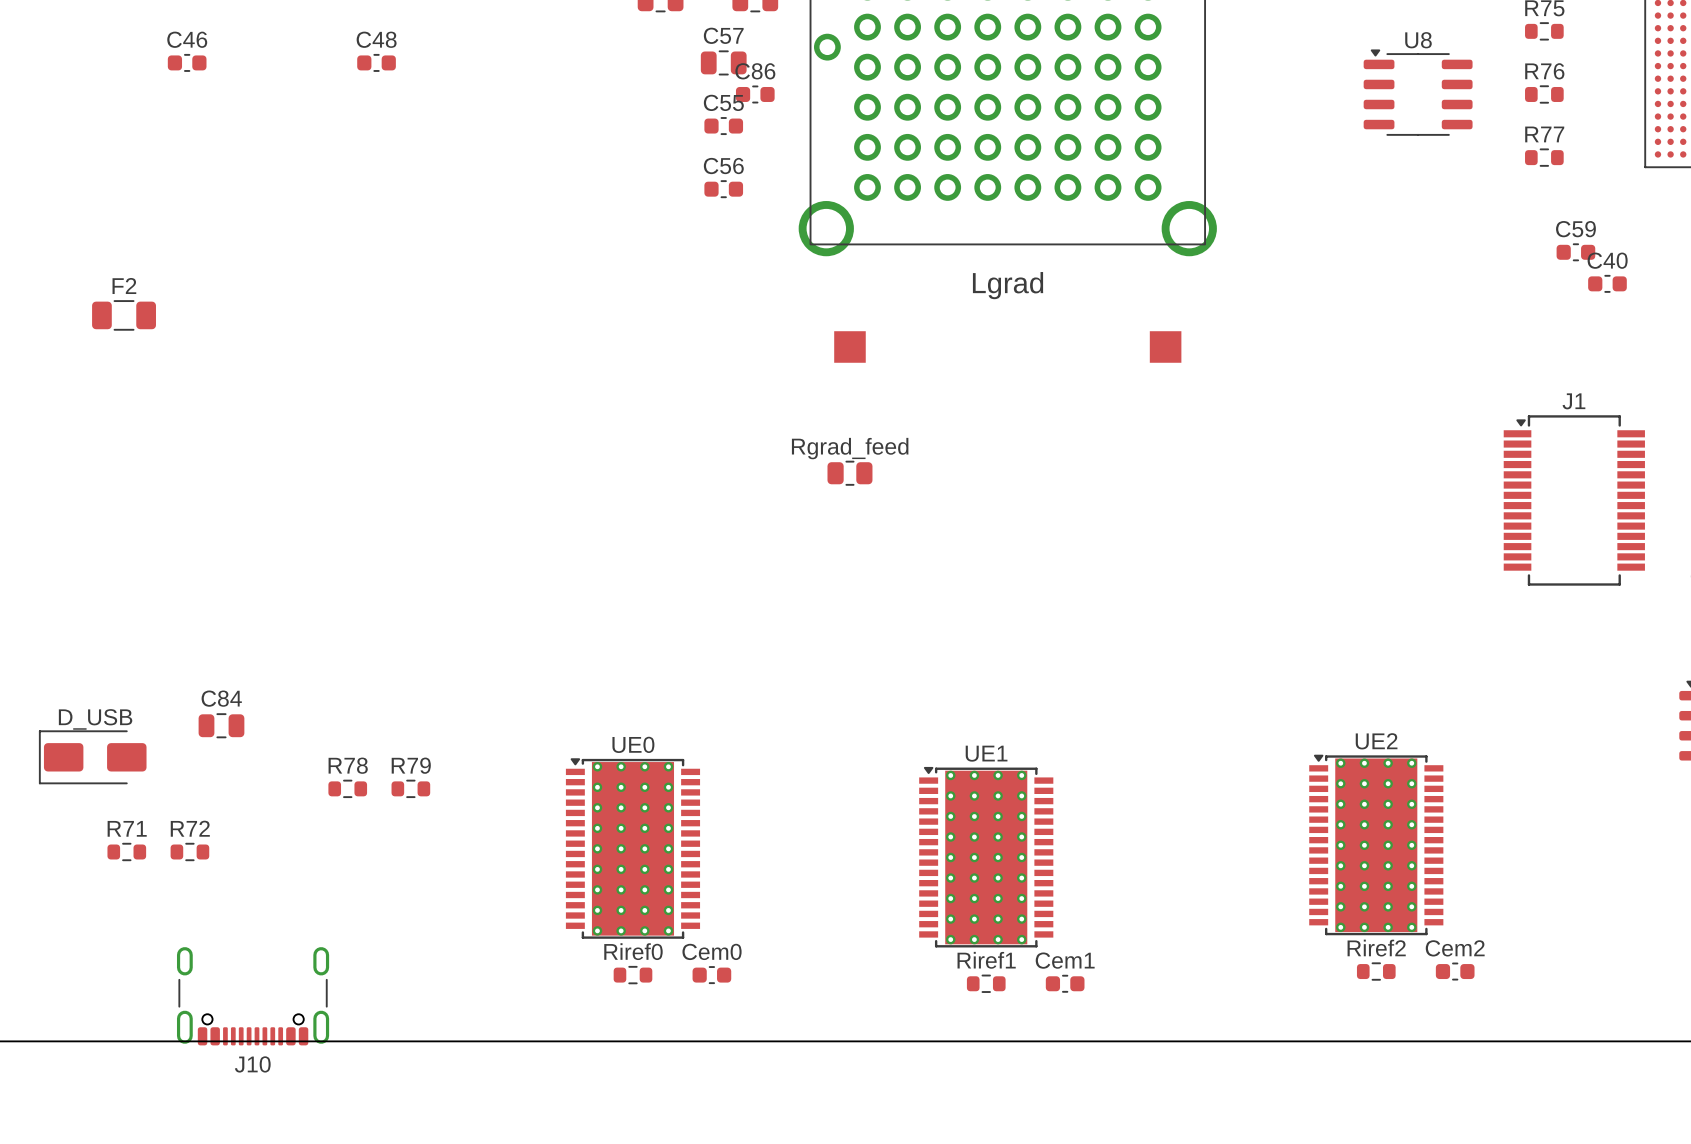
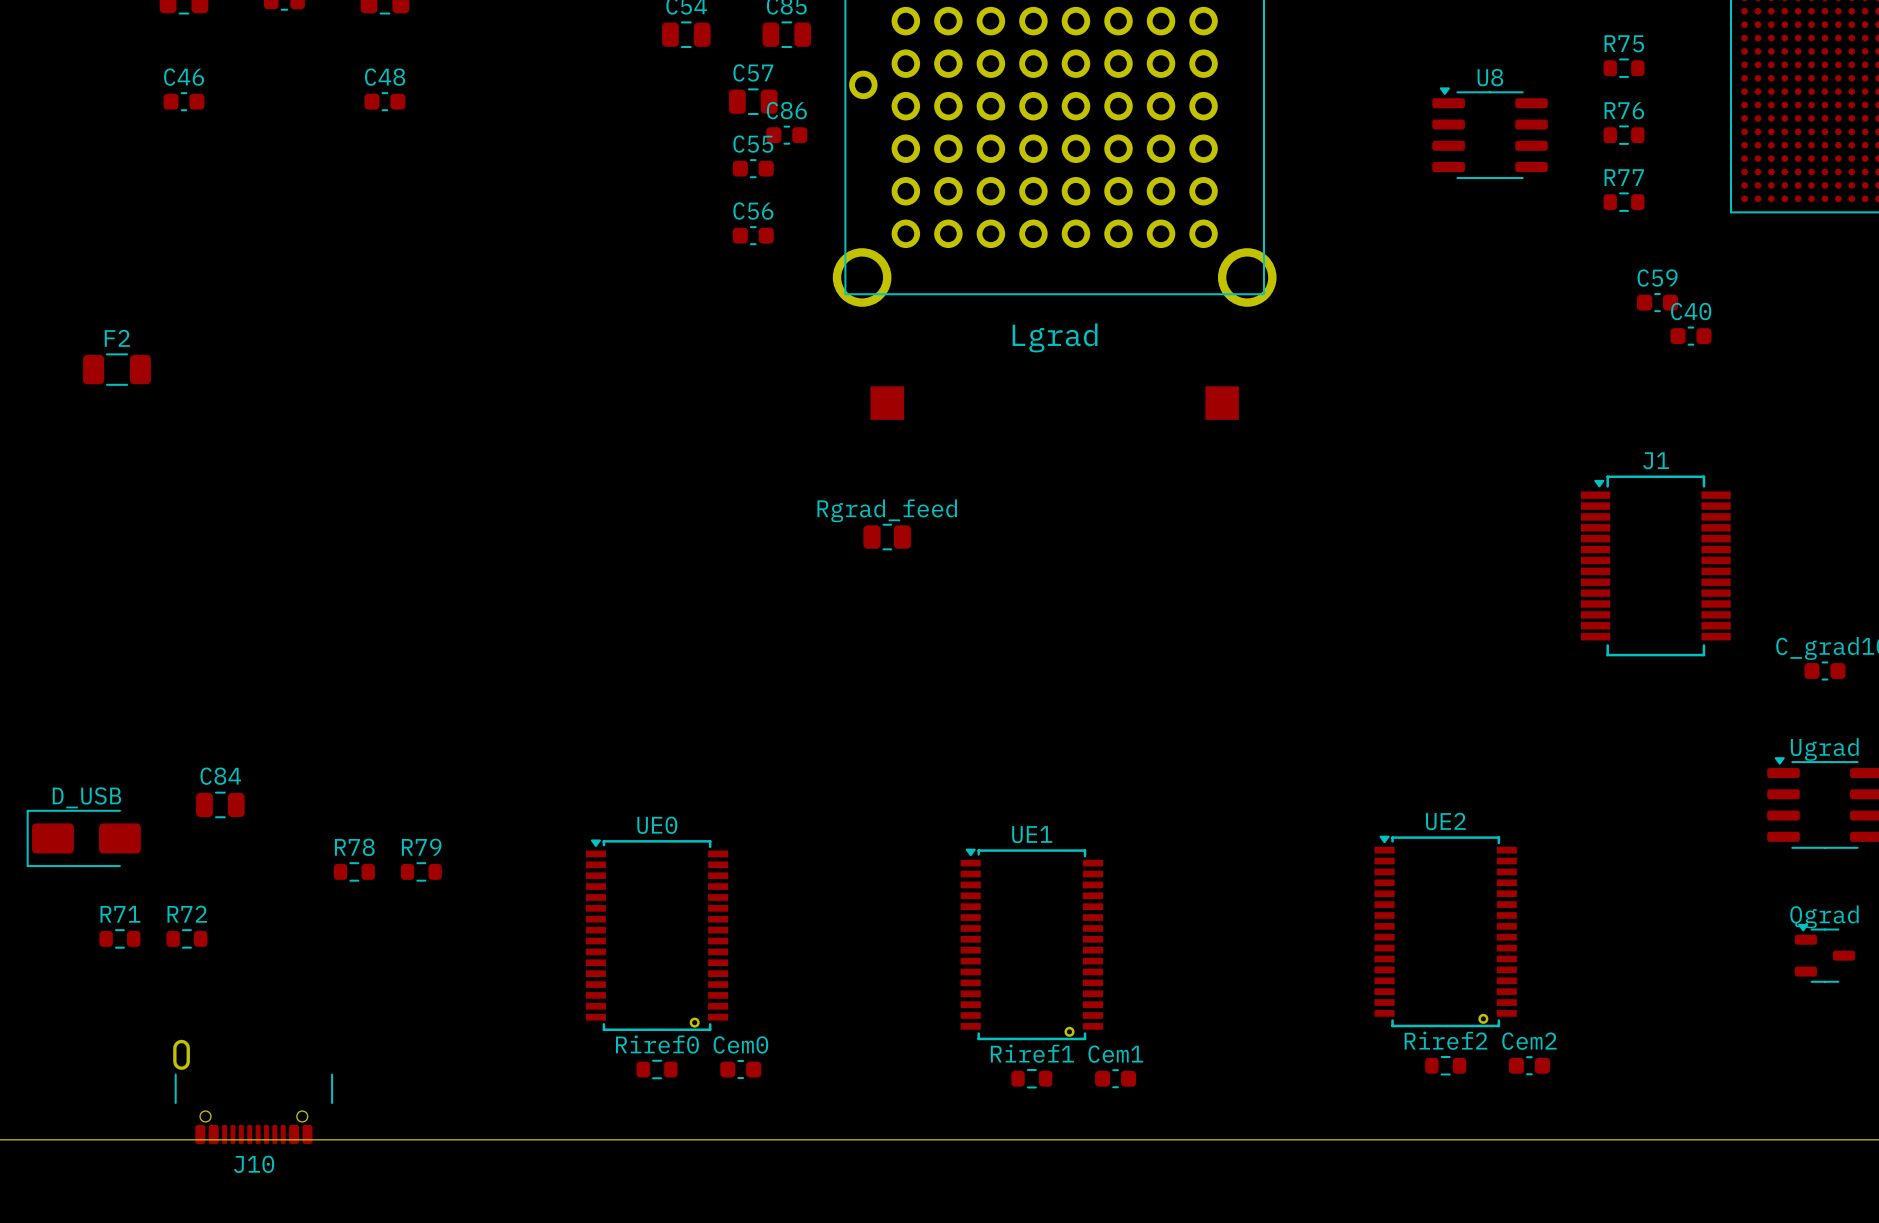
UE2 footprint: [1309, 754, 1444, 936] -> [1374, 835, 1517, 1028]
UE0 footprint: [565, 758, 701, 939] -> [585, 839, 729, 1031]
UE1 footprint: [919, 766, 1054, 948] -> [960, 848, 1104, 1041]
J10 footprint: [176, 947, 330, 1046] -> [173, 1039, 334, 1145]

